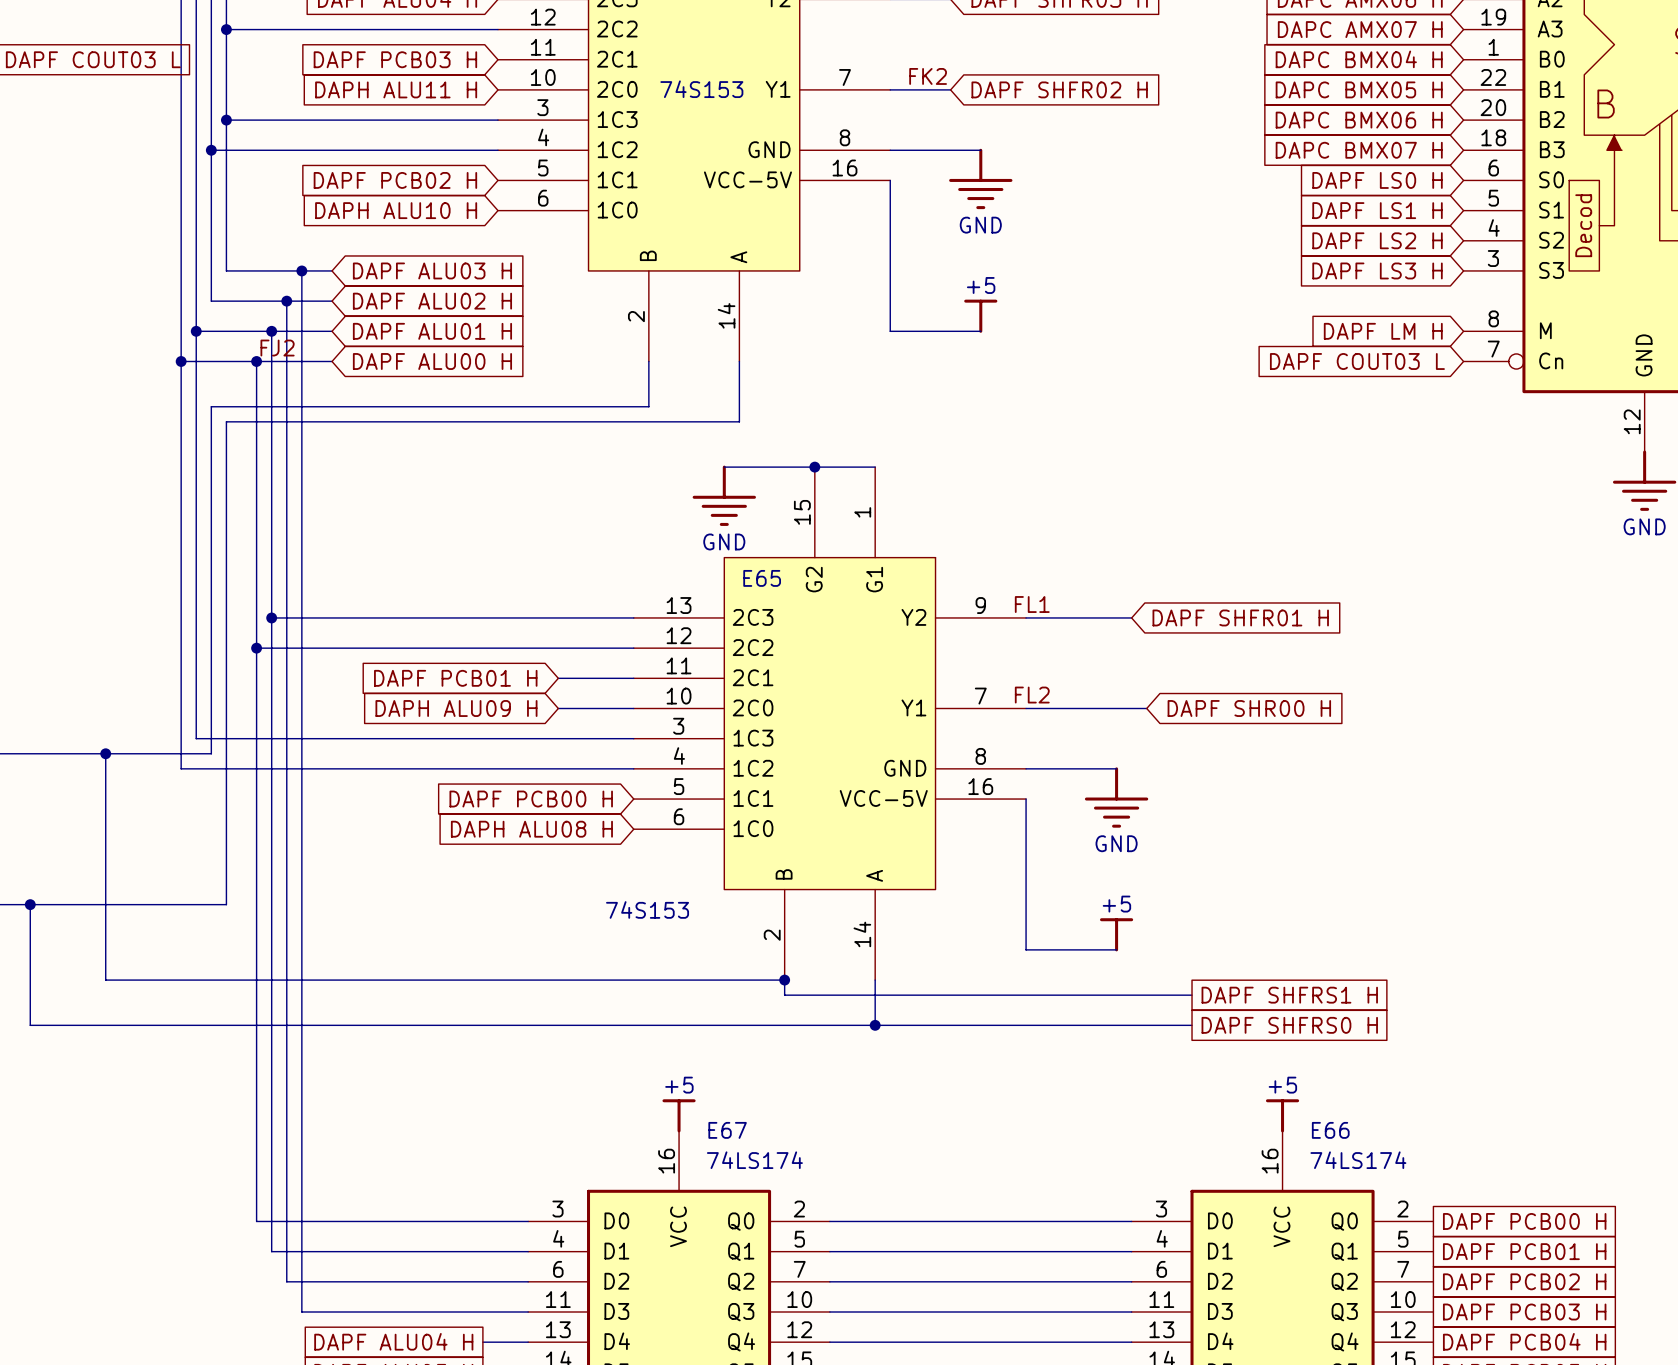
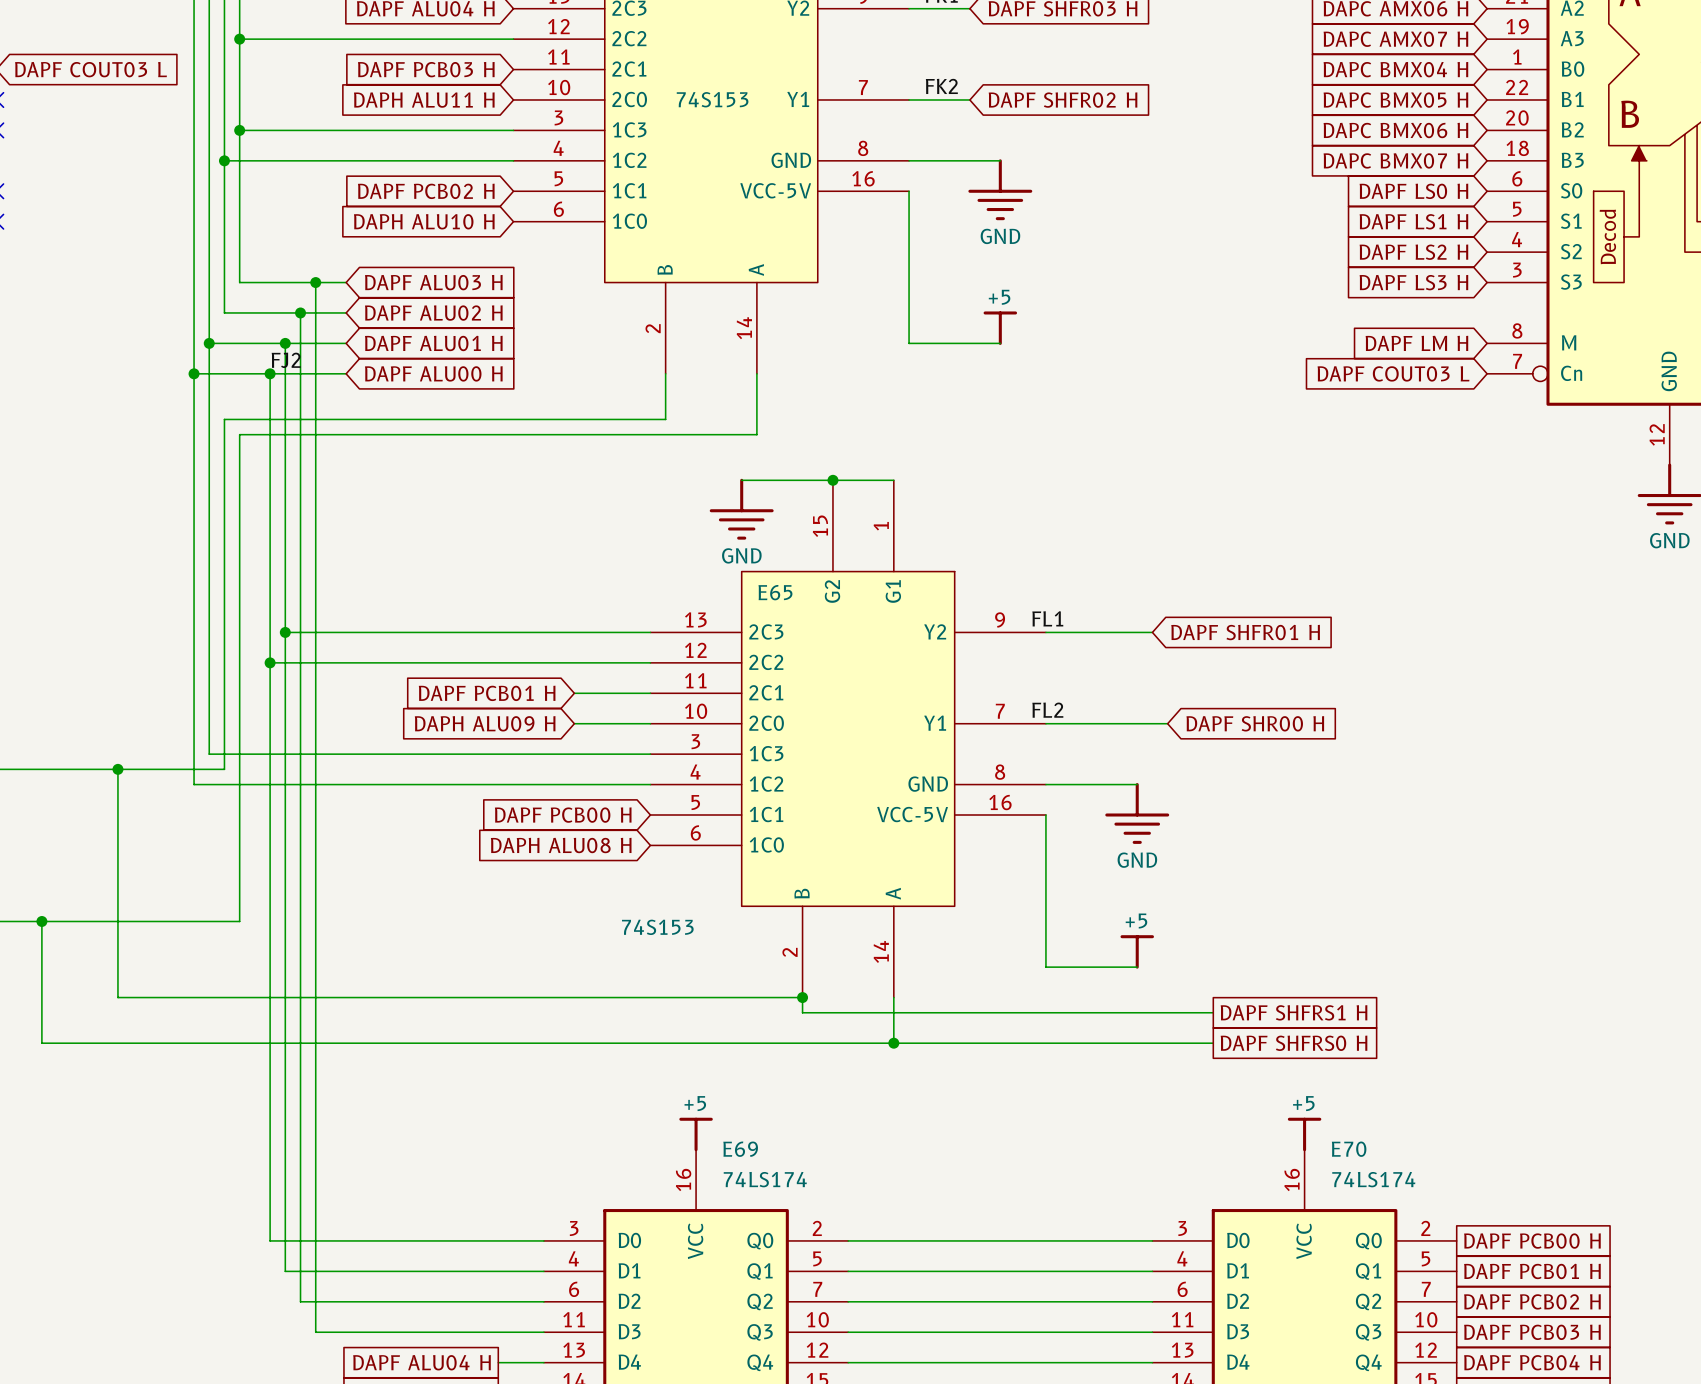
E67 name: E67 (727, 1130) -> E69 (740, 1149)
E66 name: E66 (1330, 1130) -> E70 (1349, 1149)

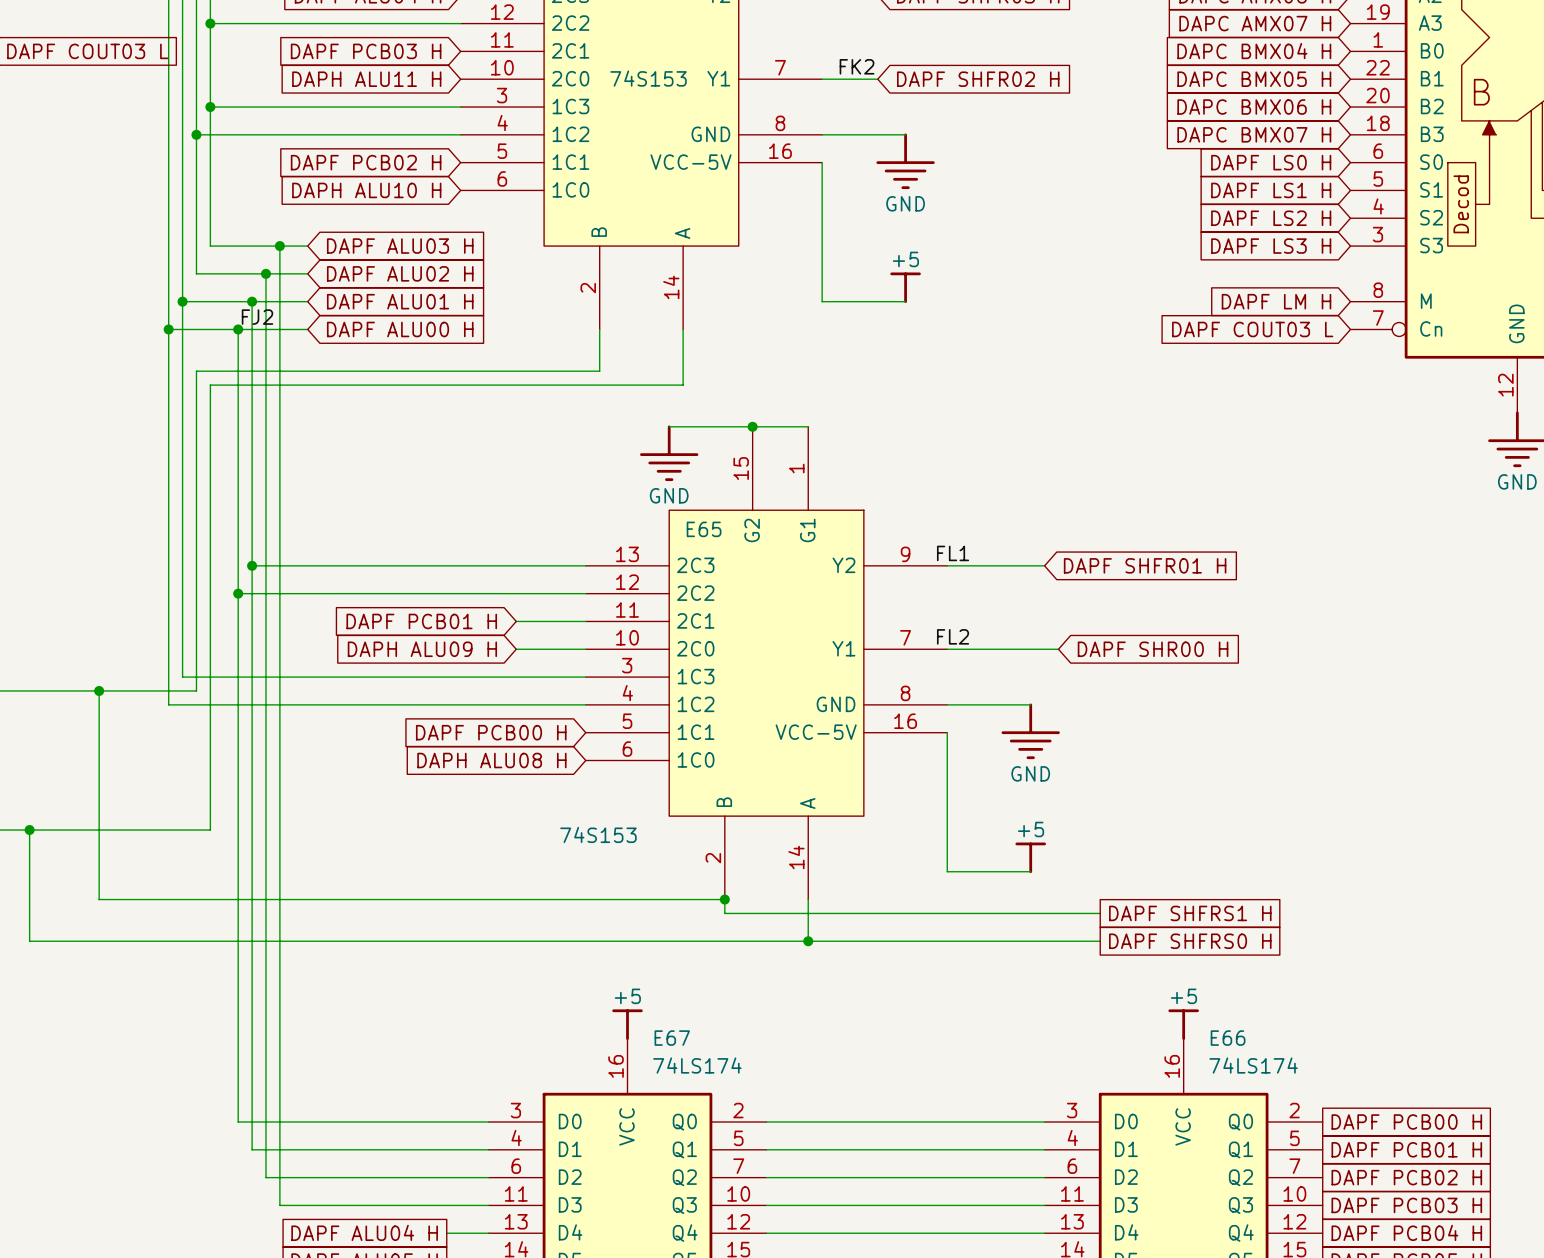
E69 name: E69 (740, 1149) -> E67 (672, 1038)
E70 name: E70 (1349, 1149) -> E66 (1228, 1038)

